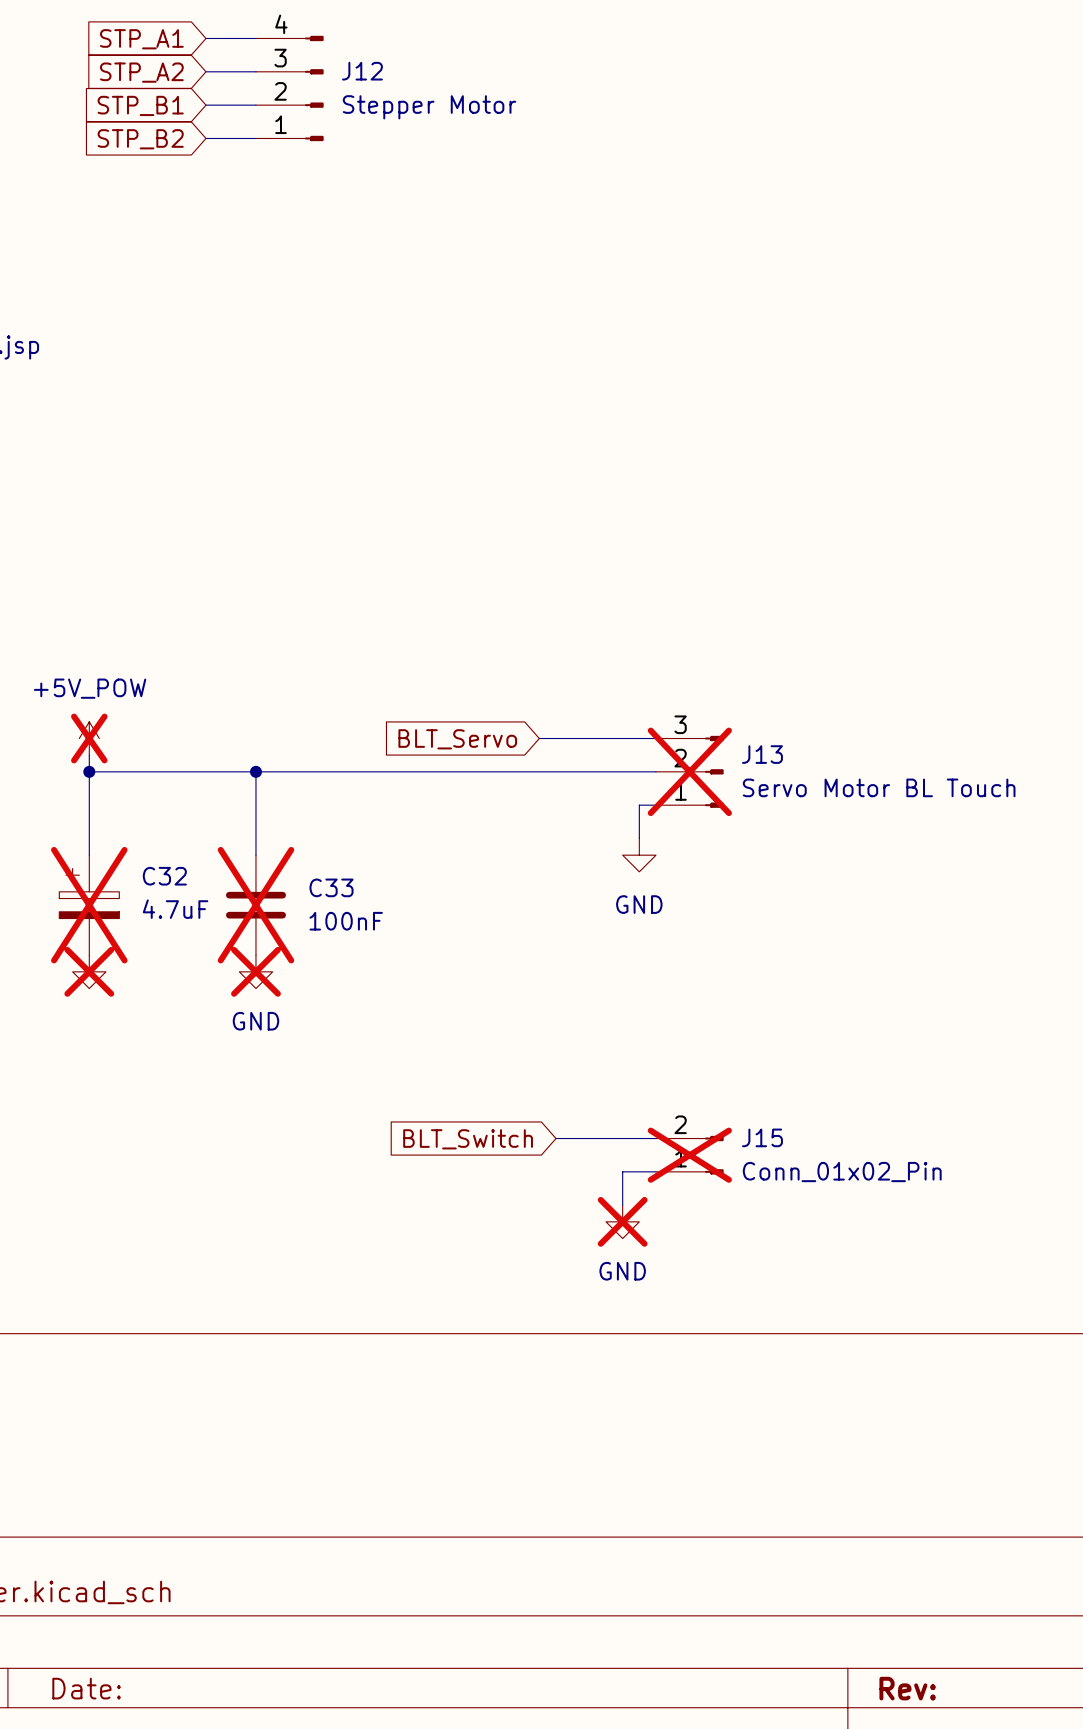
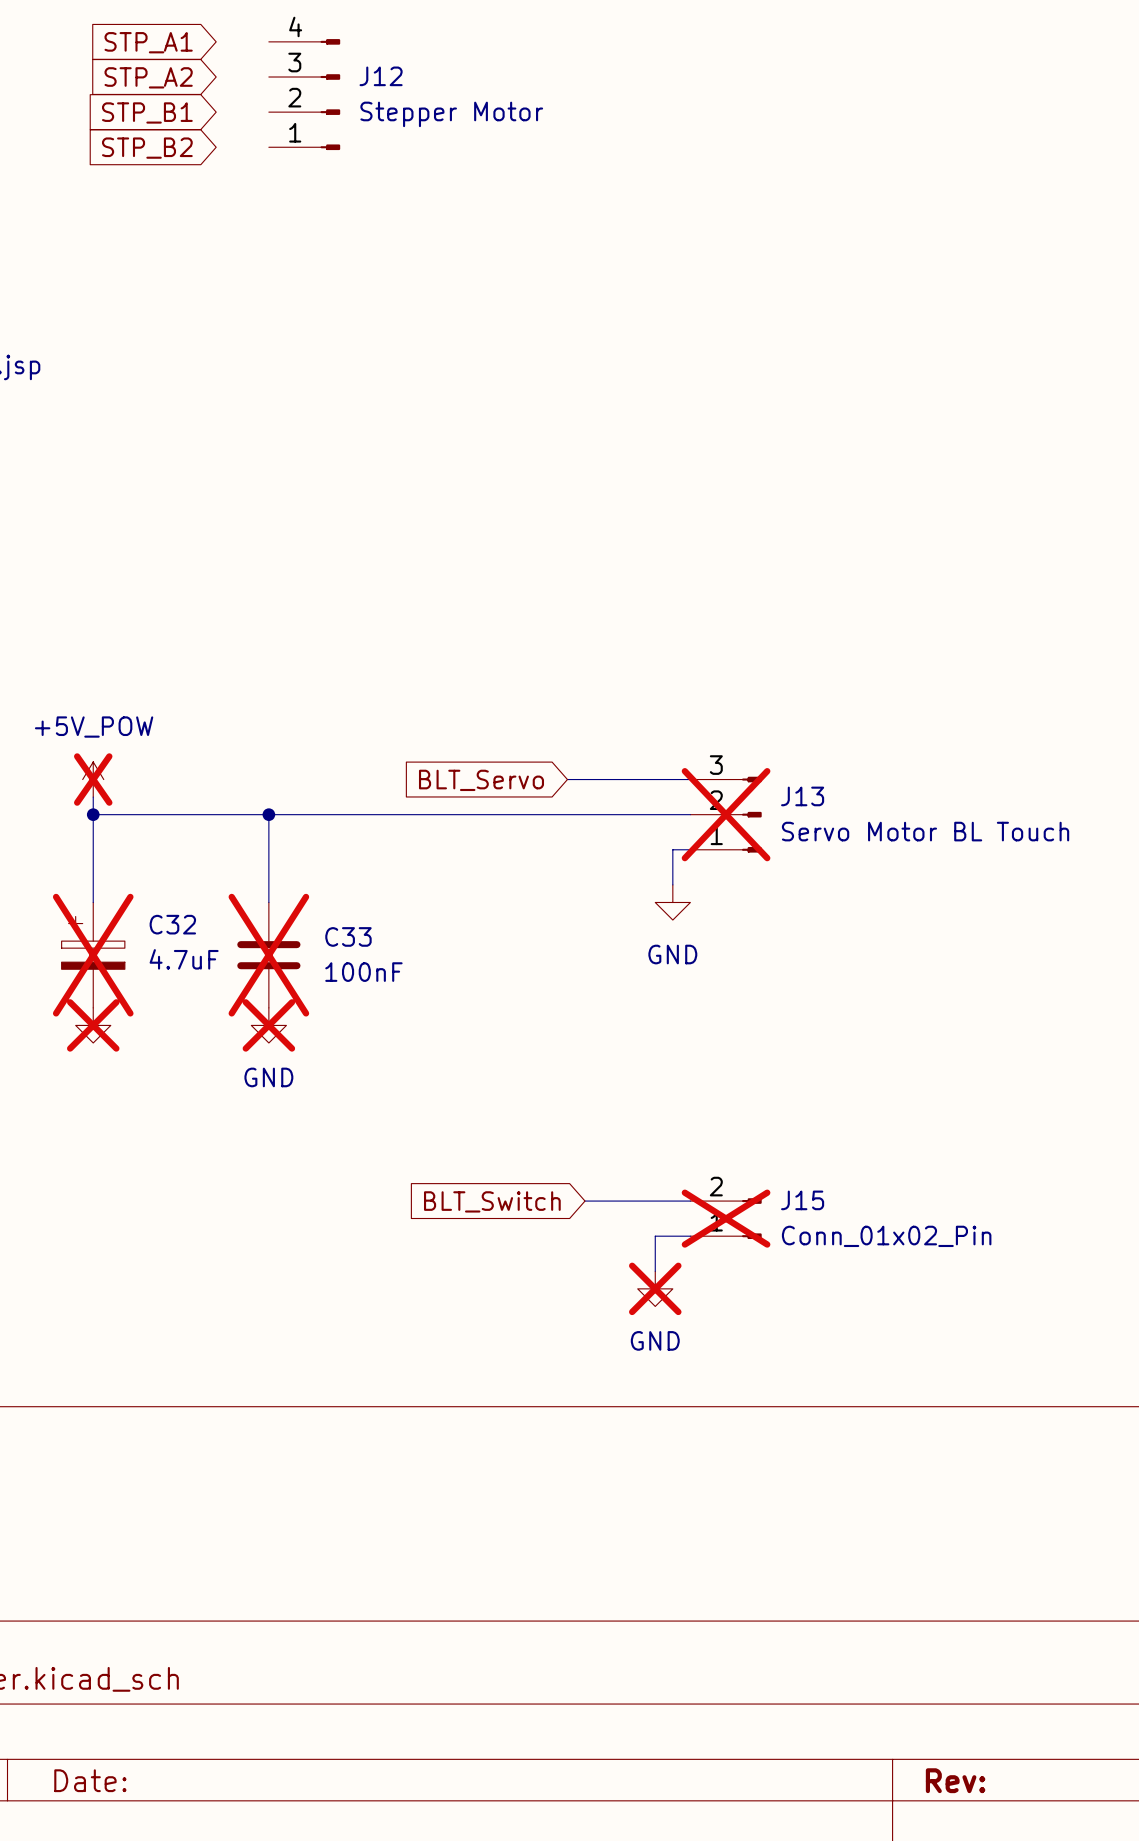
wire: (205, 38) (255, 38) -> none
wire: (205, 71) (255, 71) -> none
wire: (205, 105) (255, 105) -> none
wire: (205, 138) (255, 138) -> none

